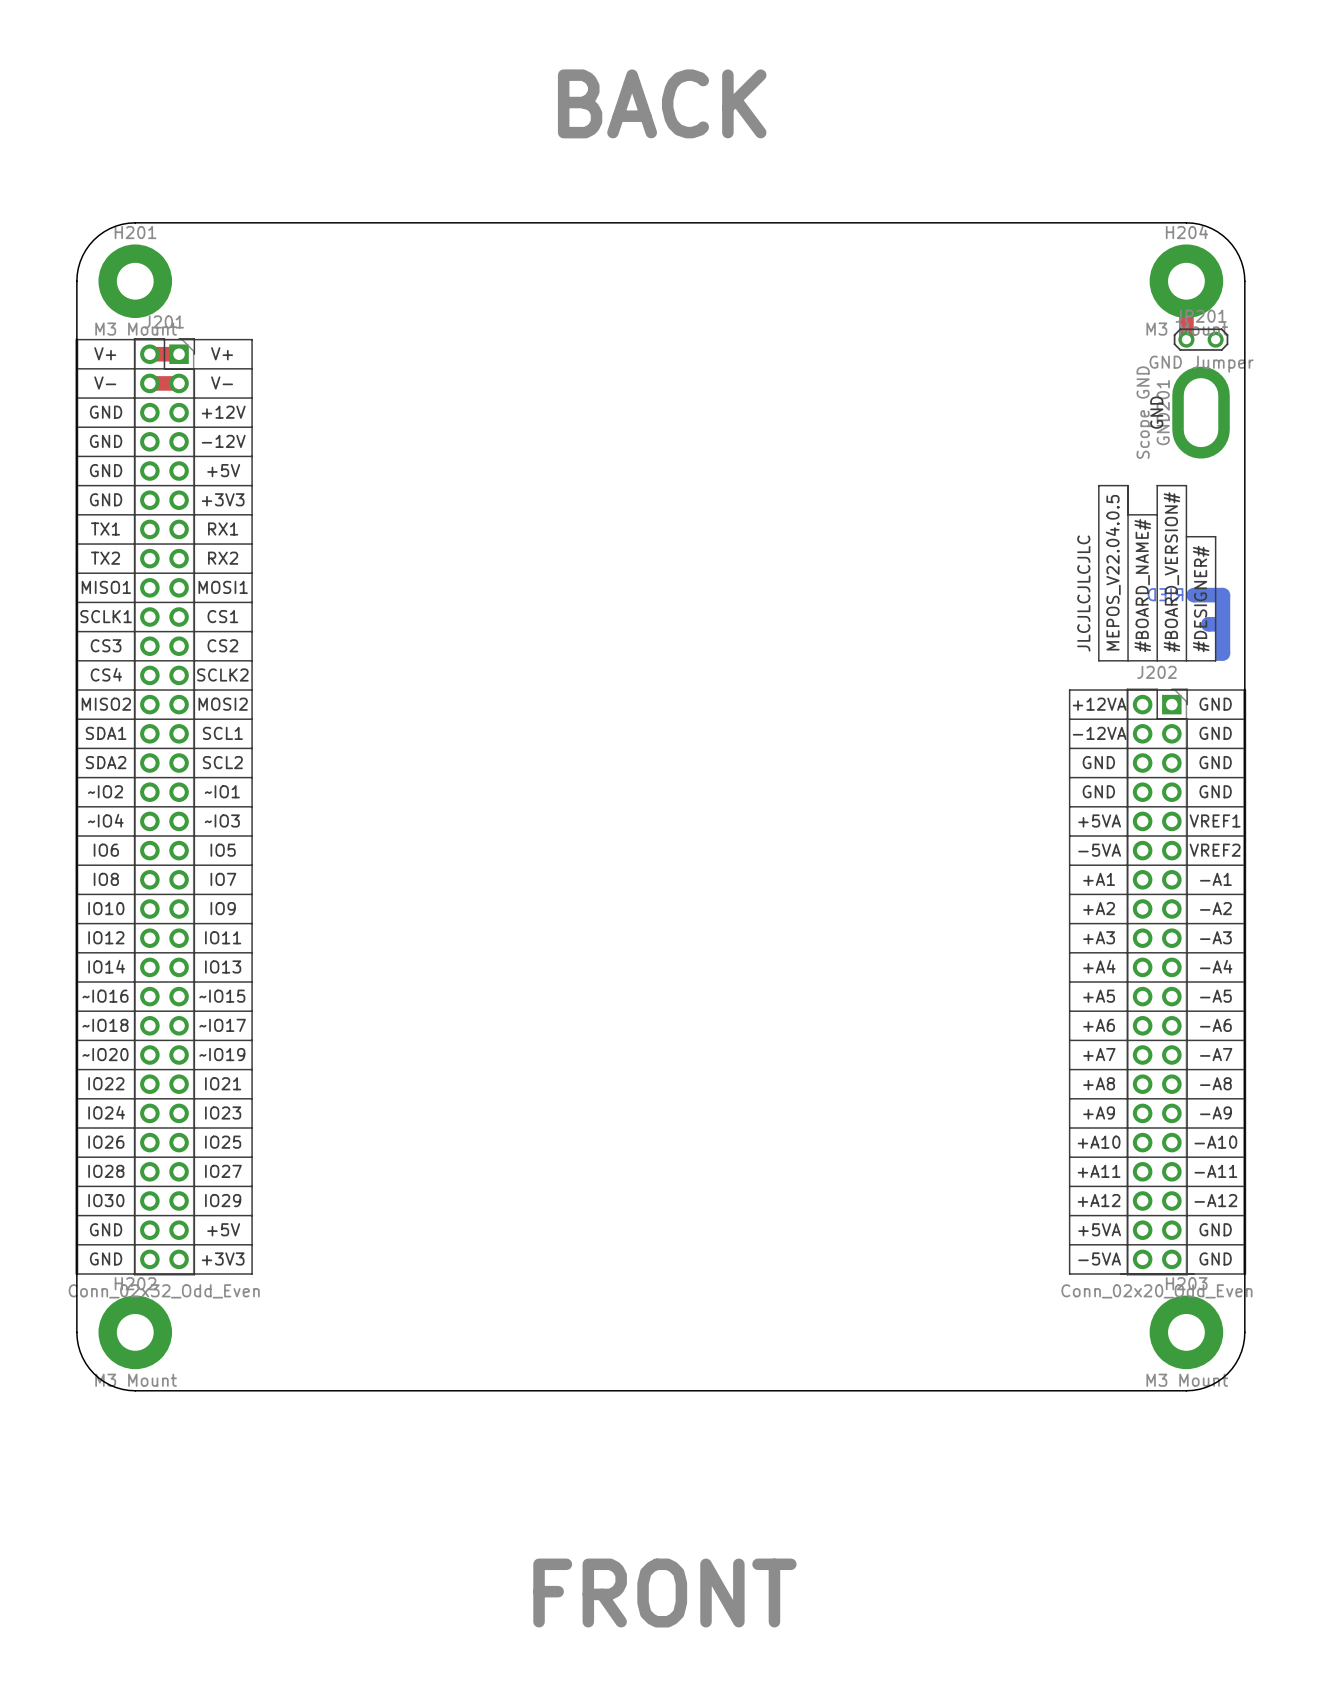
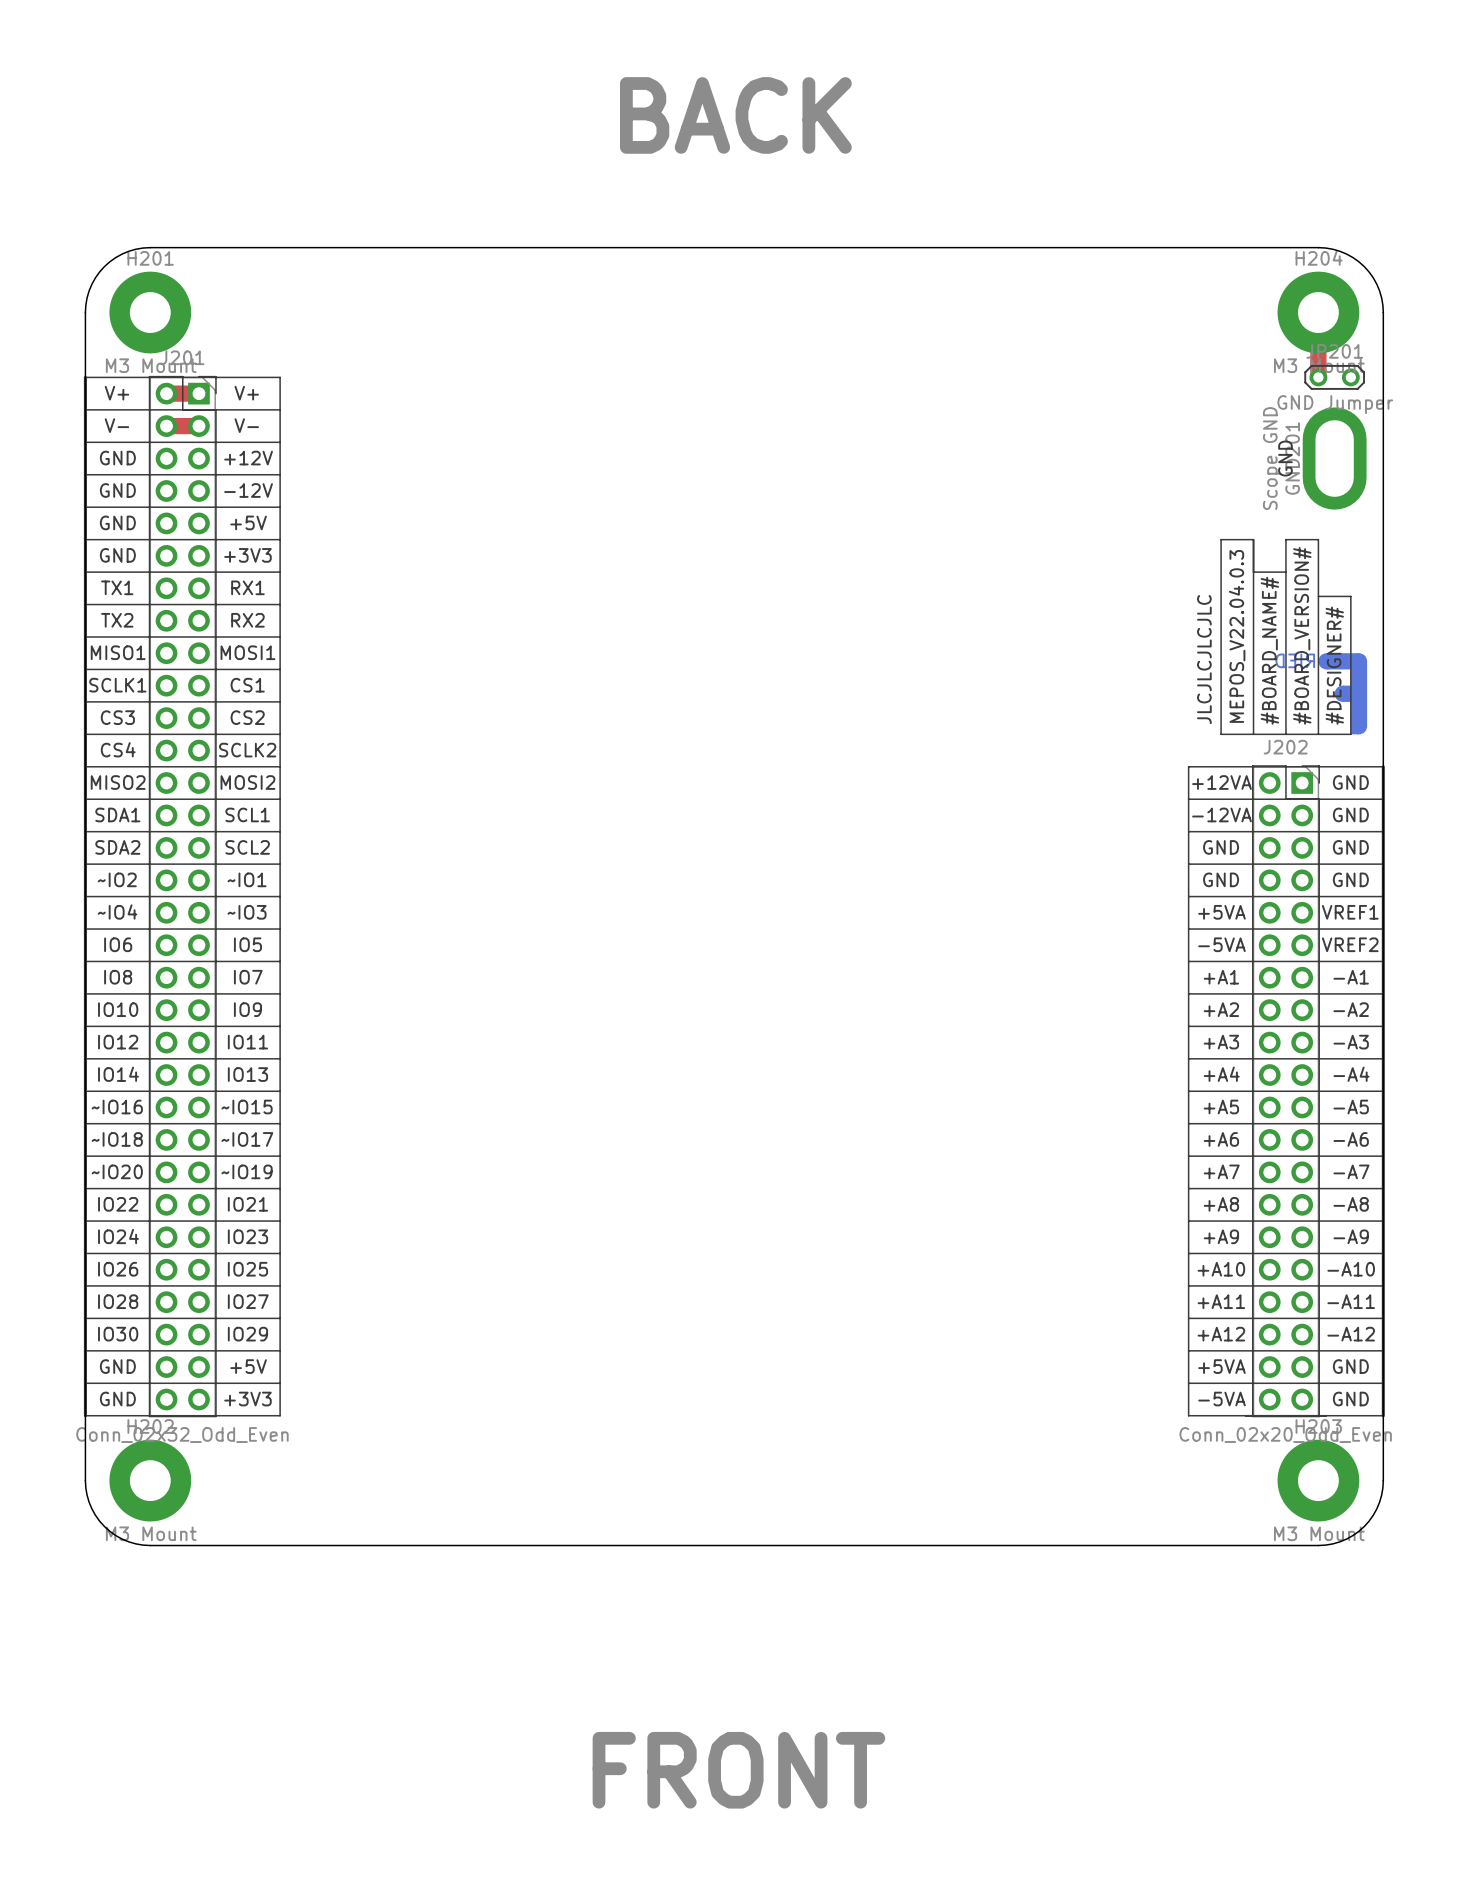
text: MEPOS_V22.04.0.5 (1113, 572) -> MEPOS_V22.04.0.3 (1237, 636)

